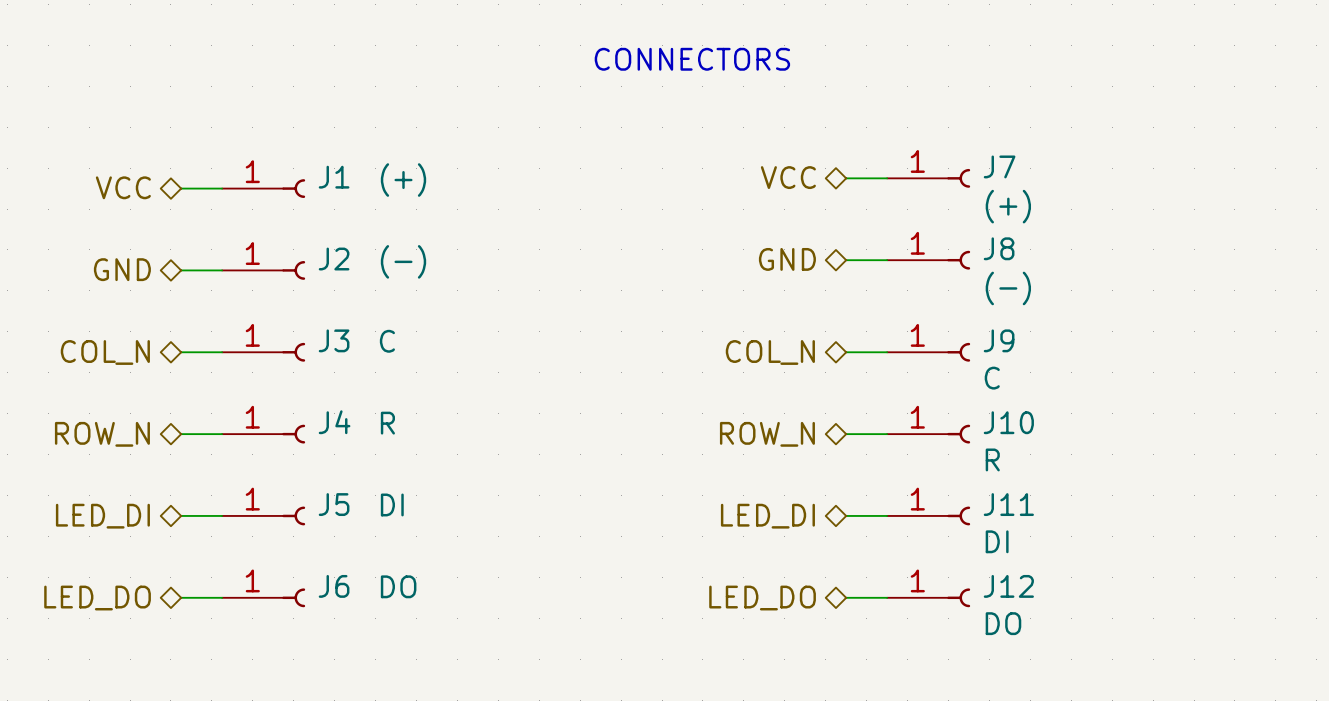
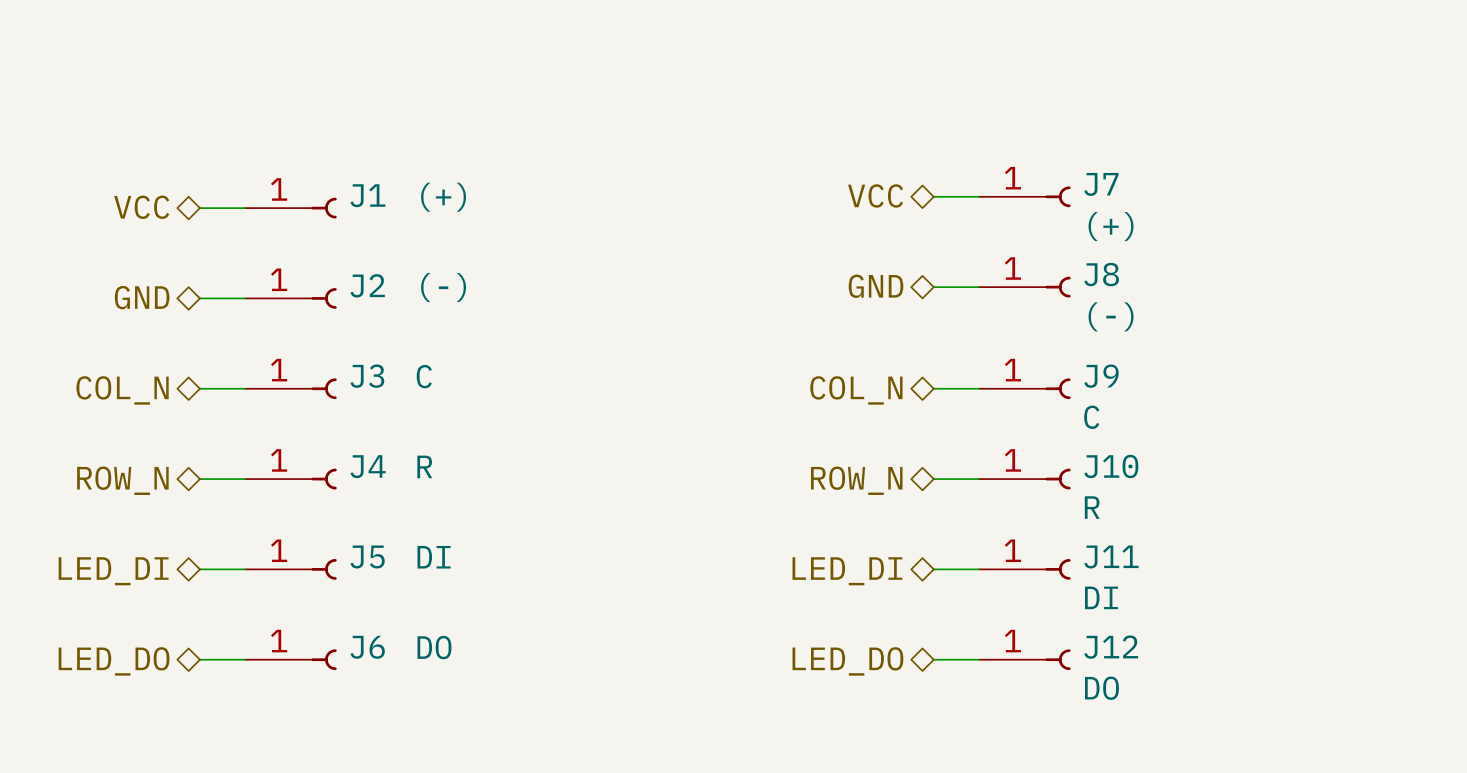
text: CONNECTORS (692, 59) -> none

